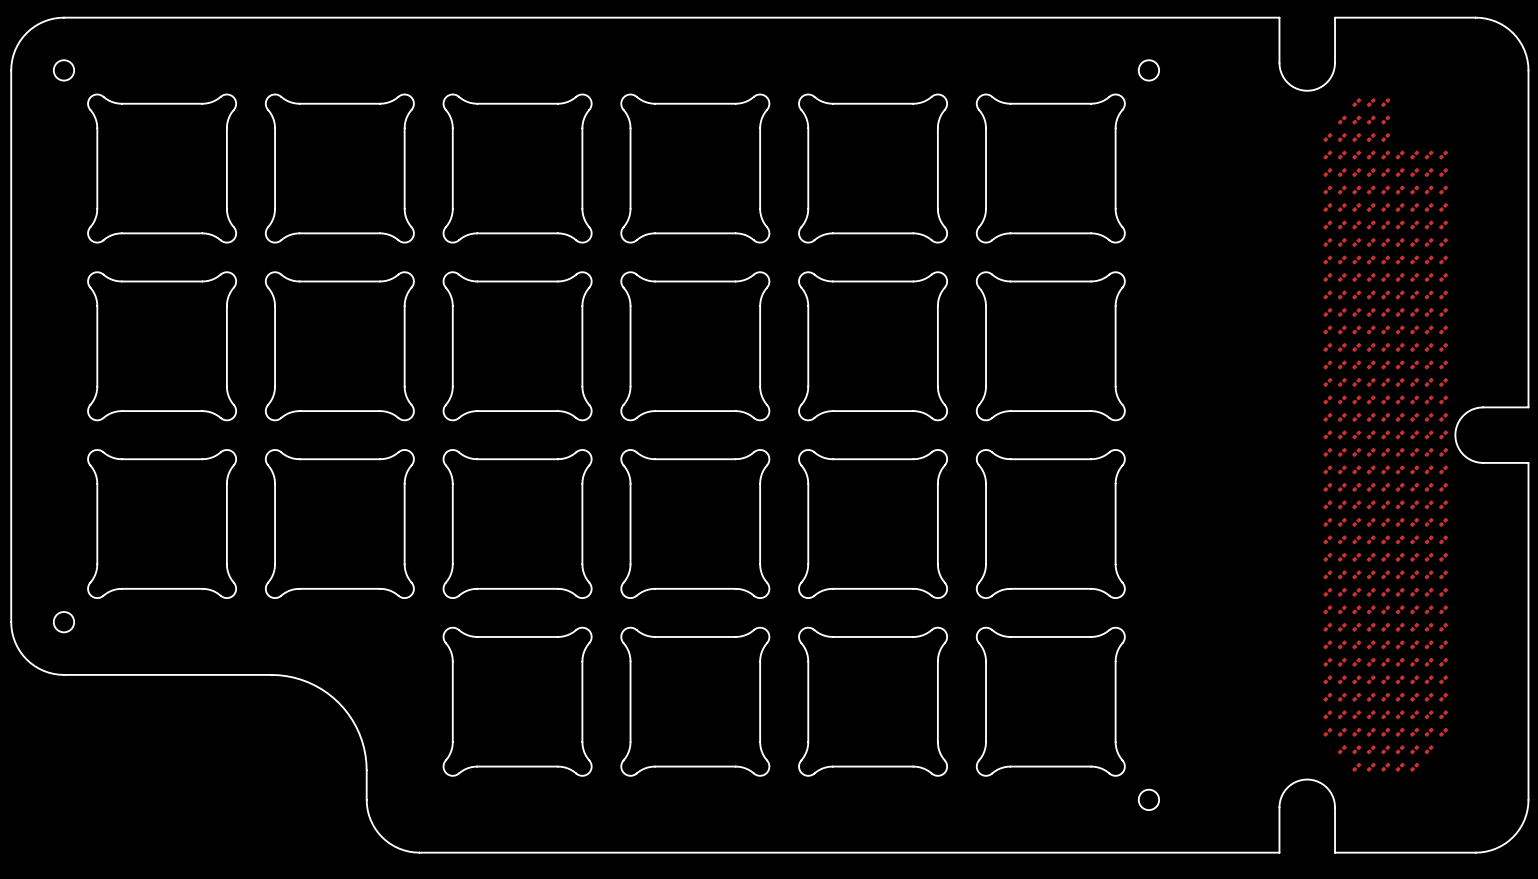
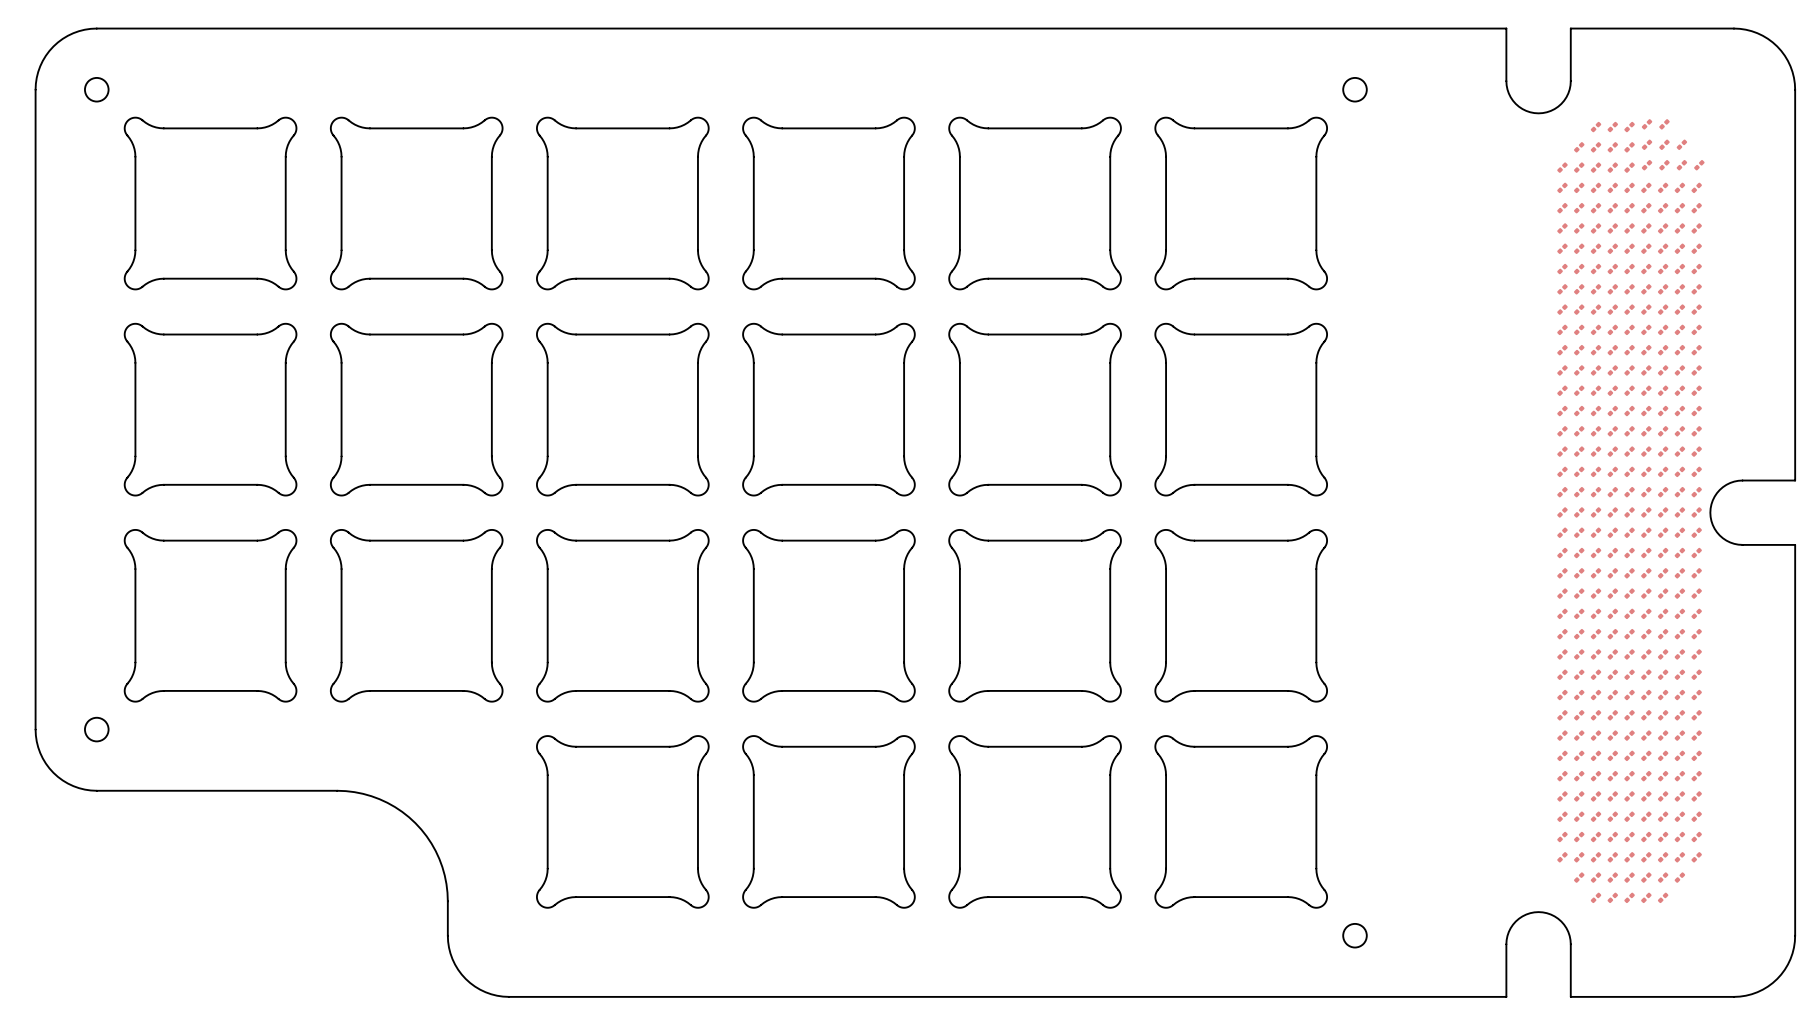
part: none -> (1647, 124)
part: none -> (1664, 124)
part: none -> (1647, 144)
part: none -> (1664, 144)
part: none -> (1681, 144)
part: none -> (1647, 165)
part: none -> (1664, 165)
part: none -> (1681, 165)
part: none -> (1699, 165)

